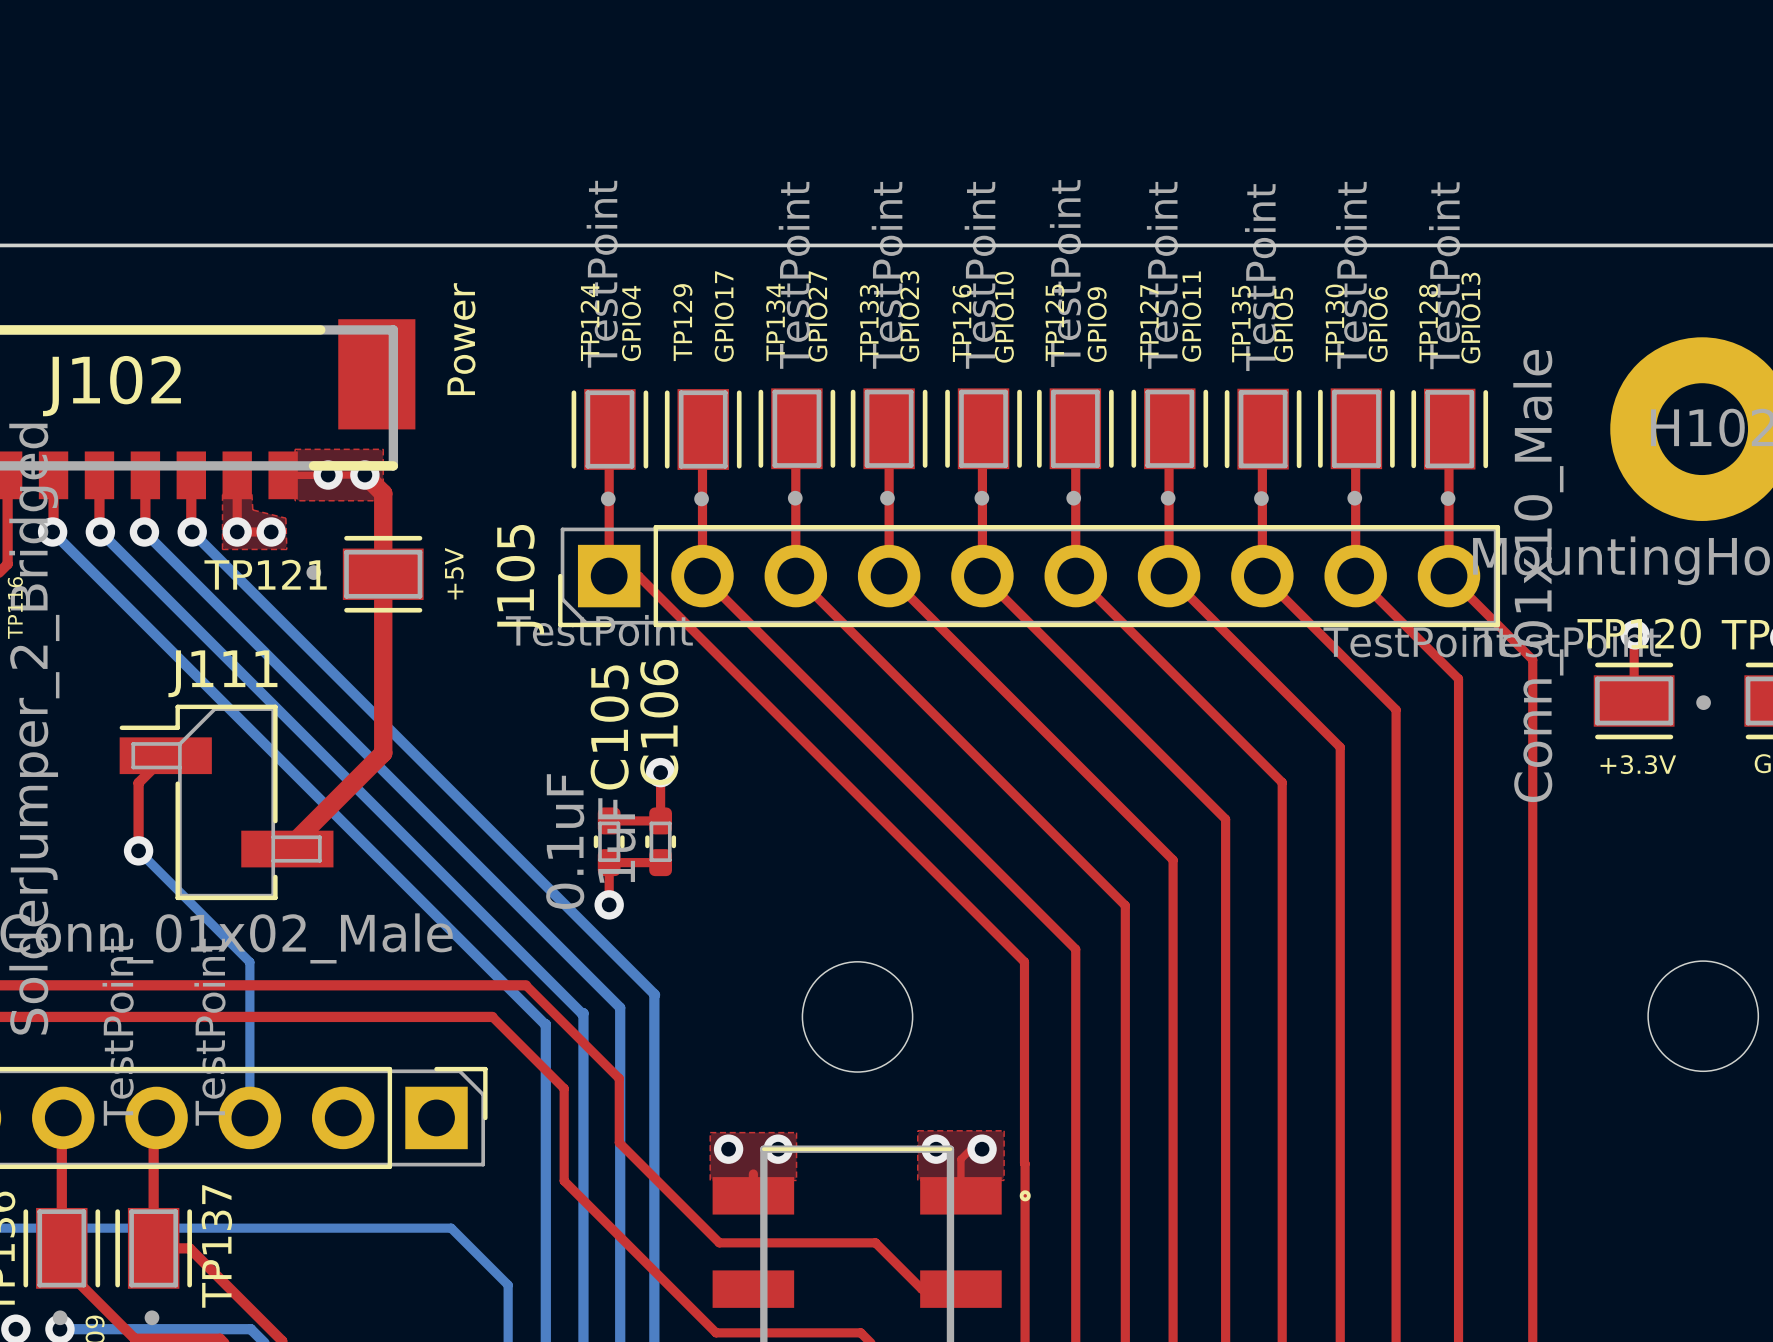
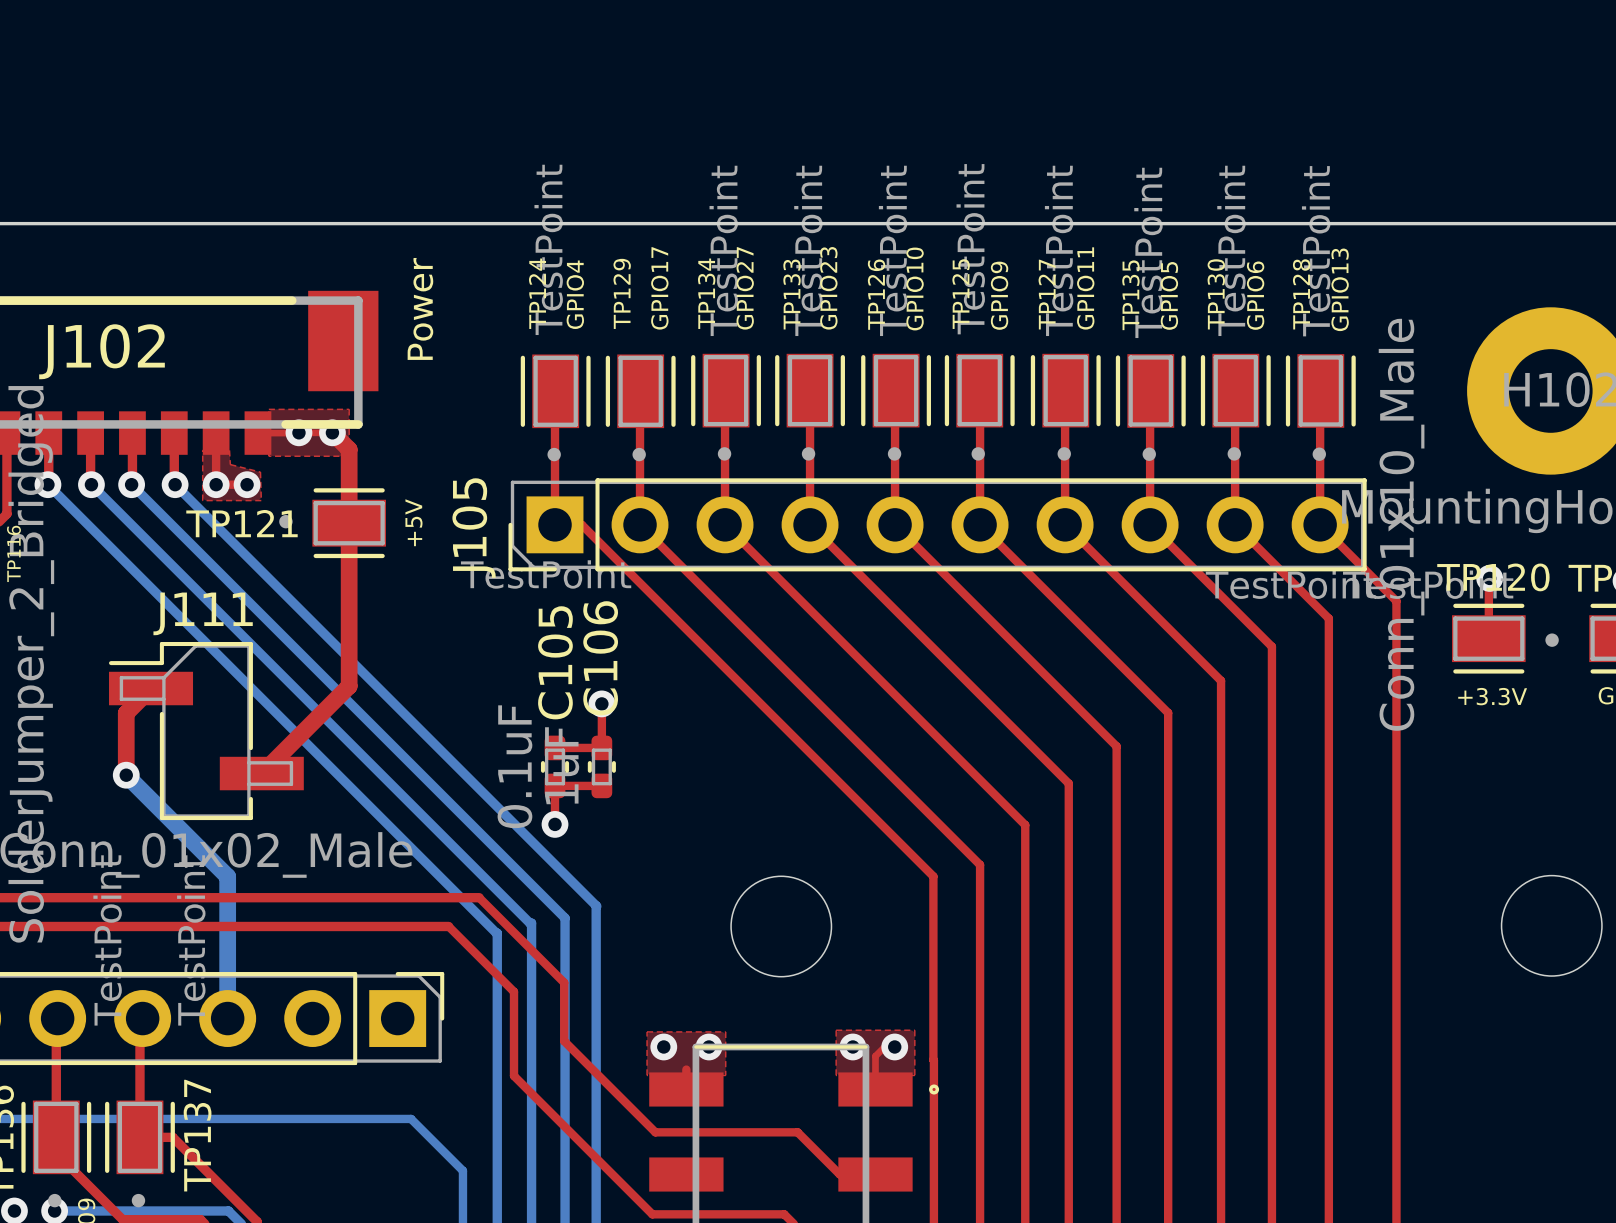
top track width: thin (165, 755) (138, 782) (138, 850) -> thick (151, 688) (126, 713) (126, 775)
bottom track width: thin (138, 850) (249, 962) (249, 1117) -> thick (126, 775) (227, 876) (227, 1018)

